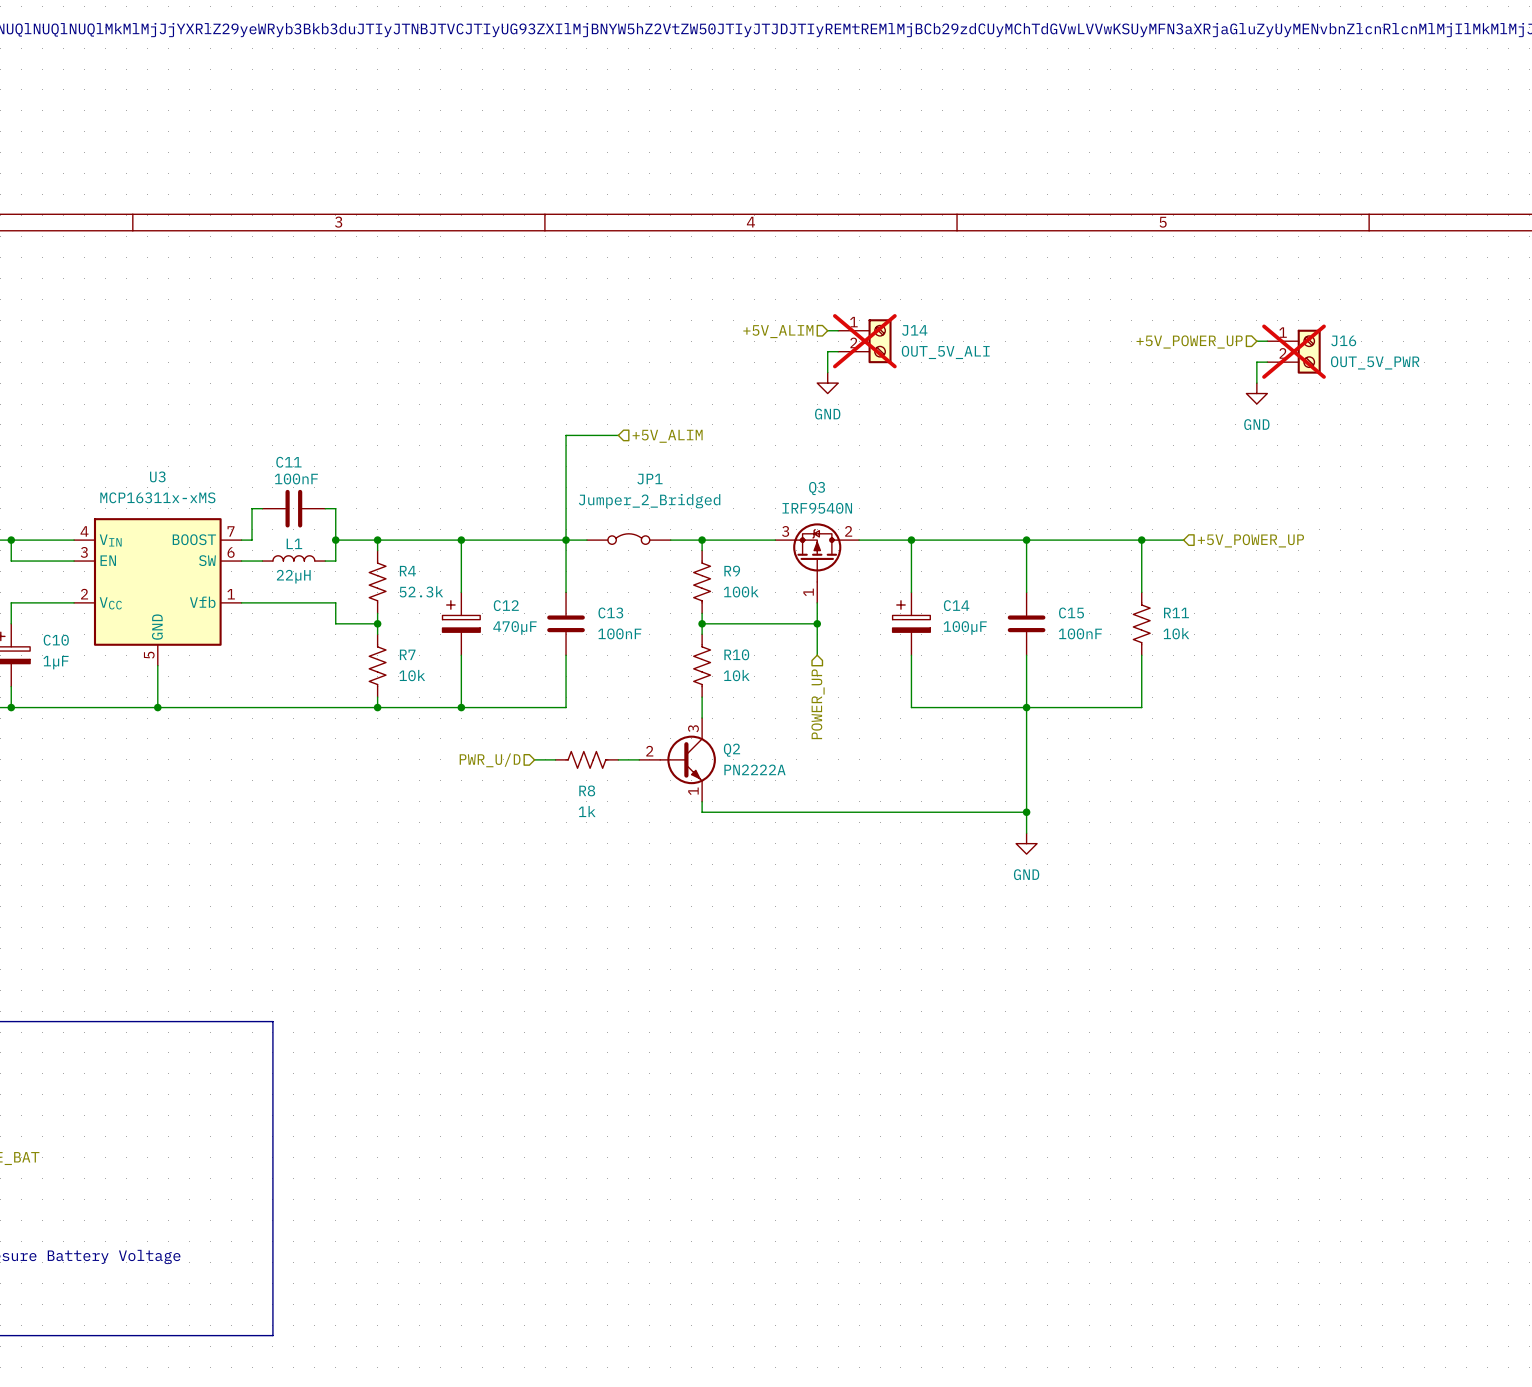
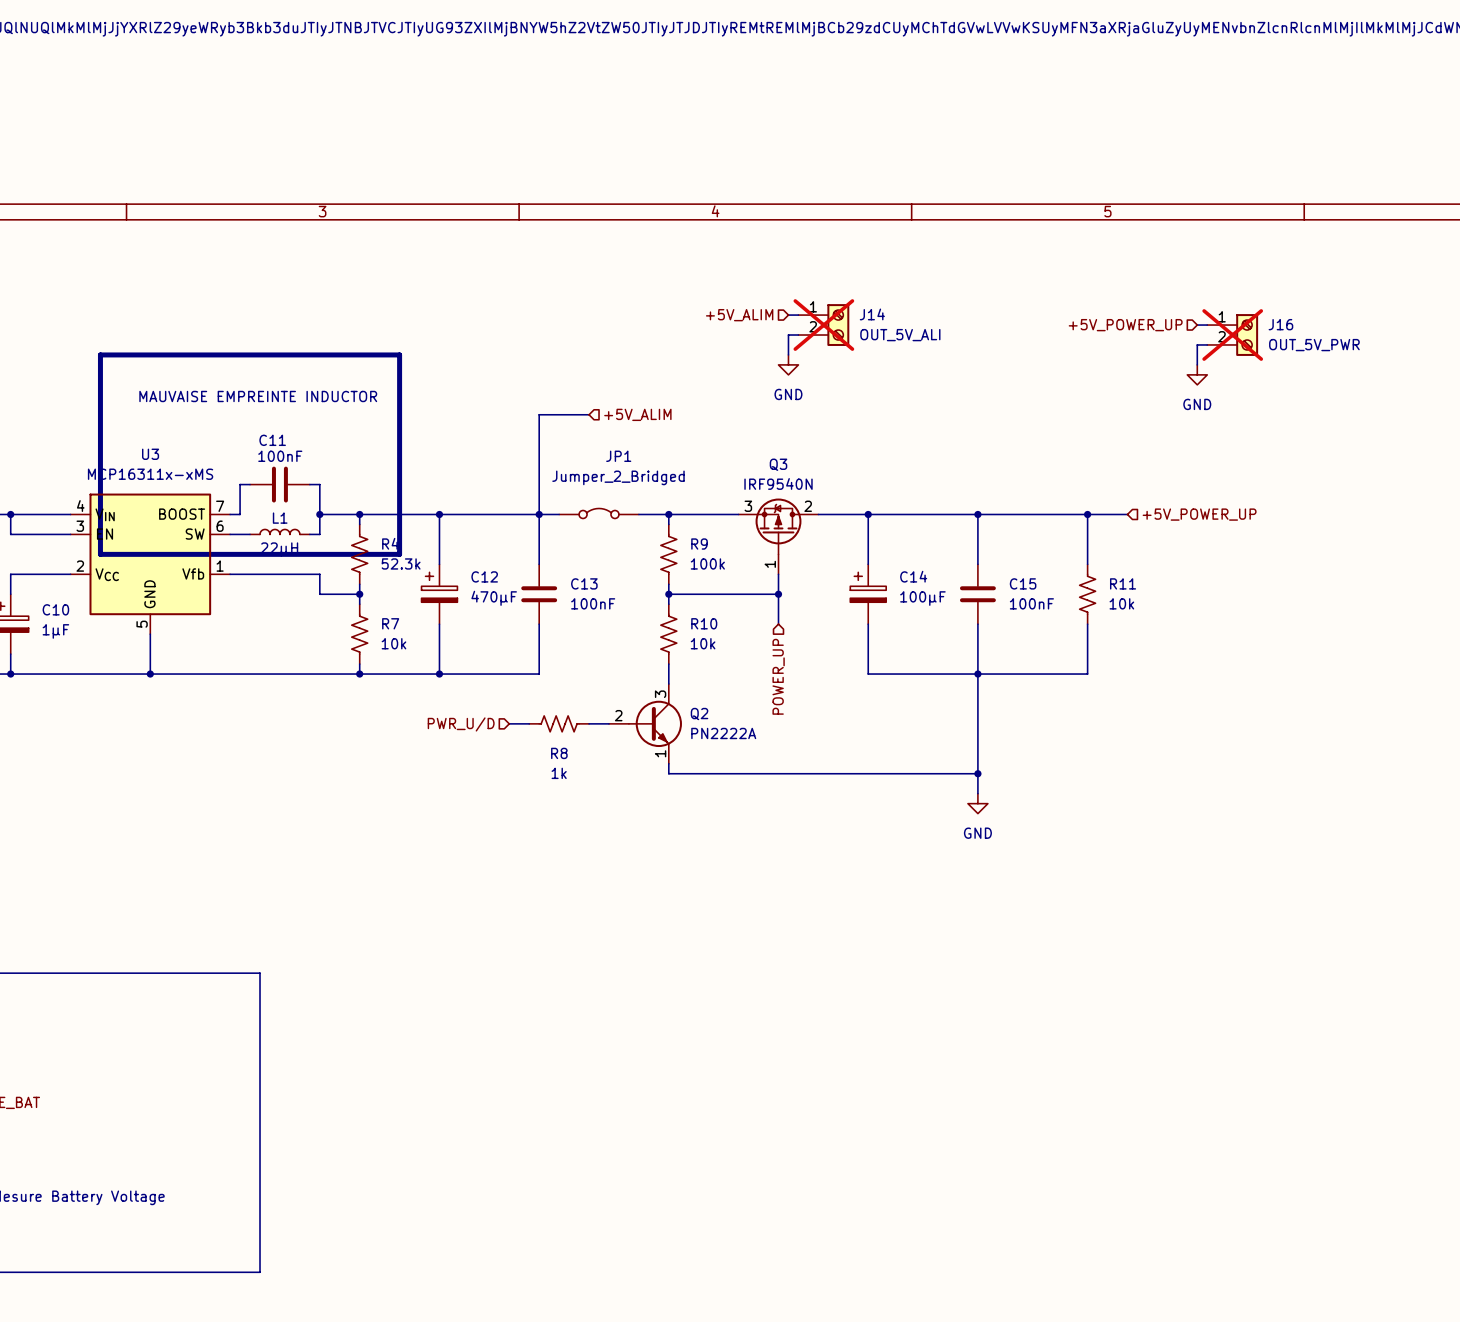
line: none -> (100, 354) (399, 354) (399, 554) (100, 554) (100, 354)
text: none -> MAUVAISE EMPREINTE INDUCTOR (258, 396)

